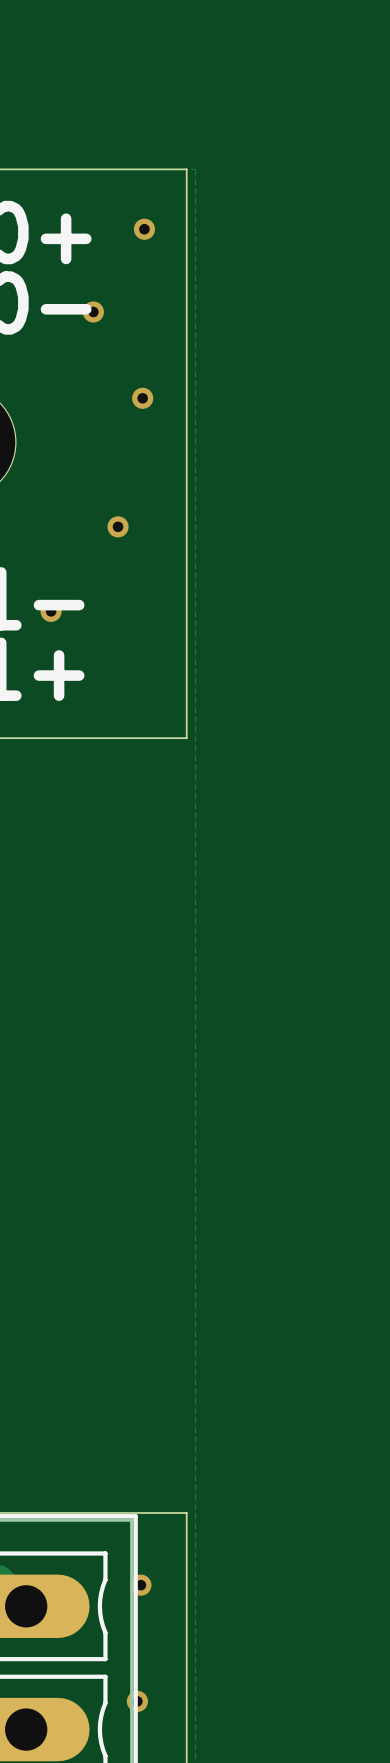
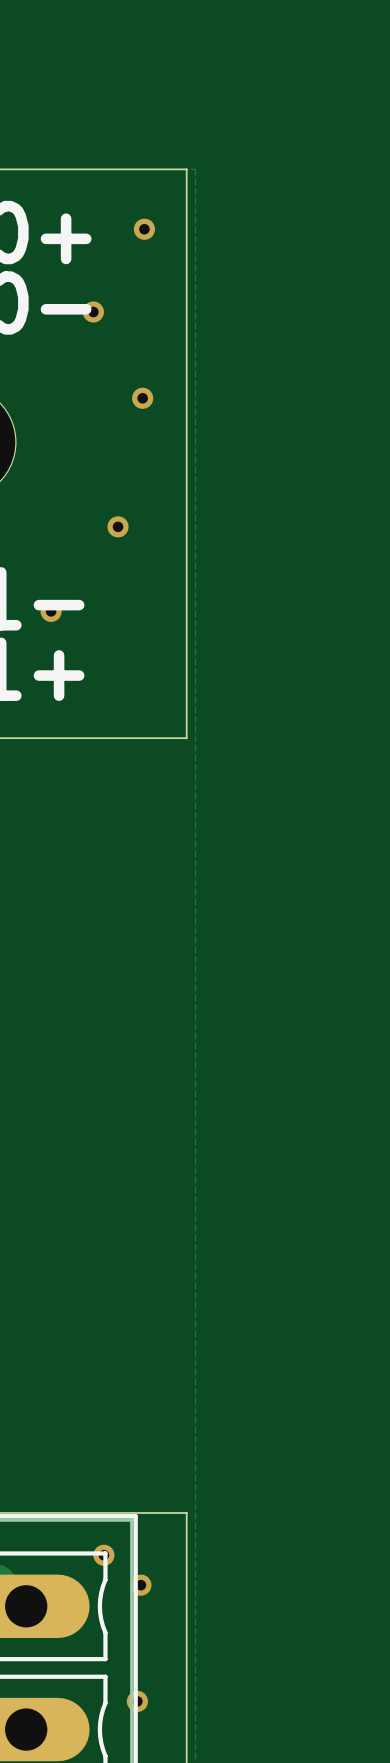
via: none -> (103, 1555)

